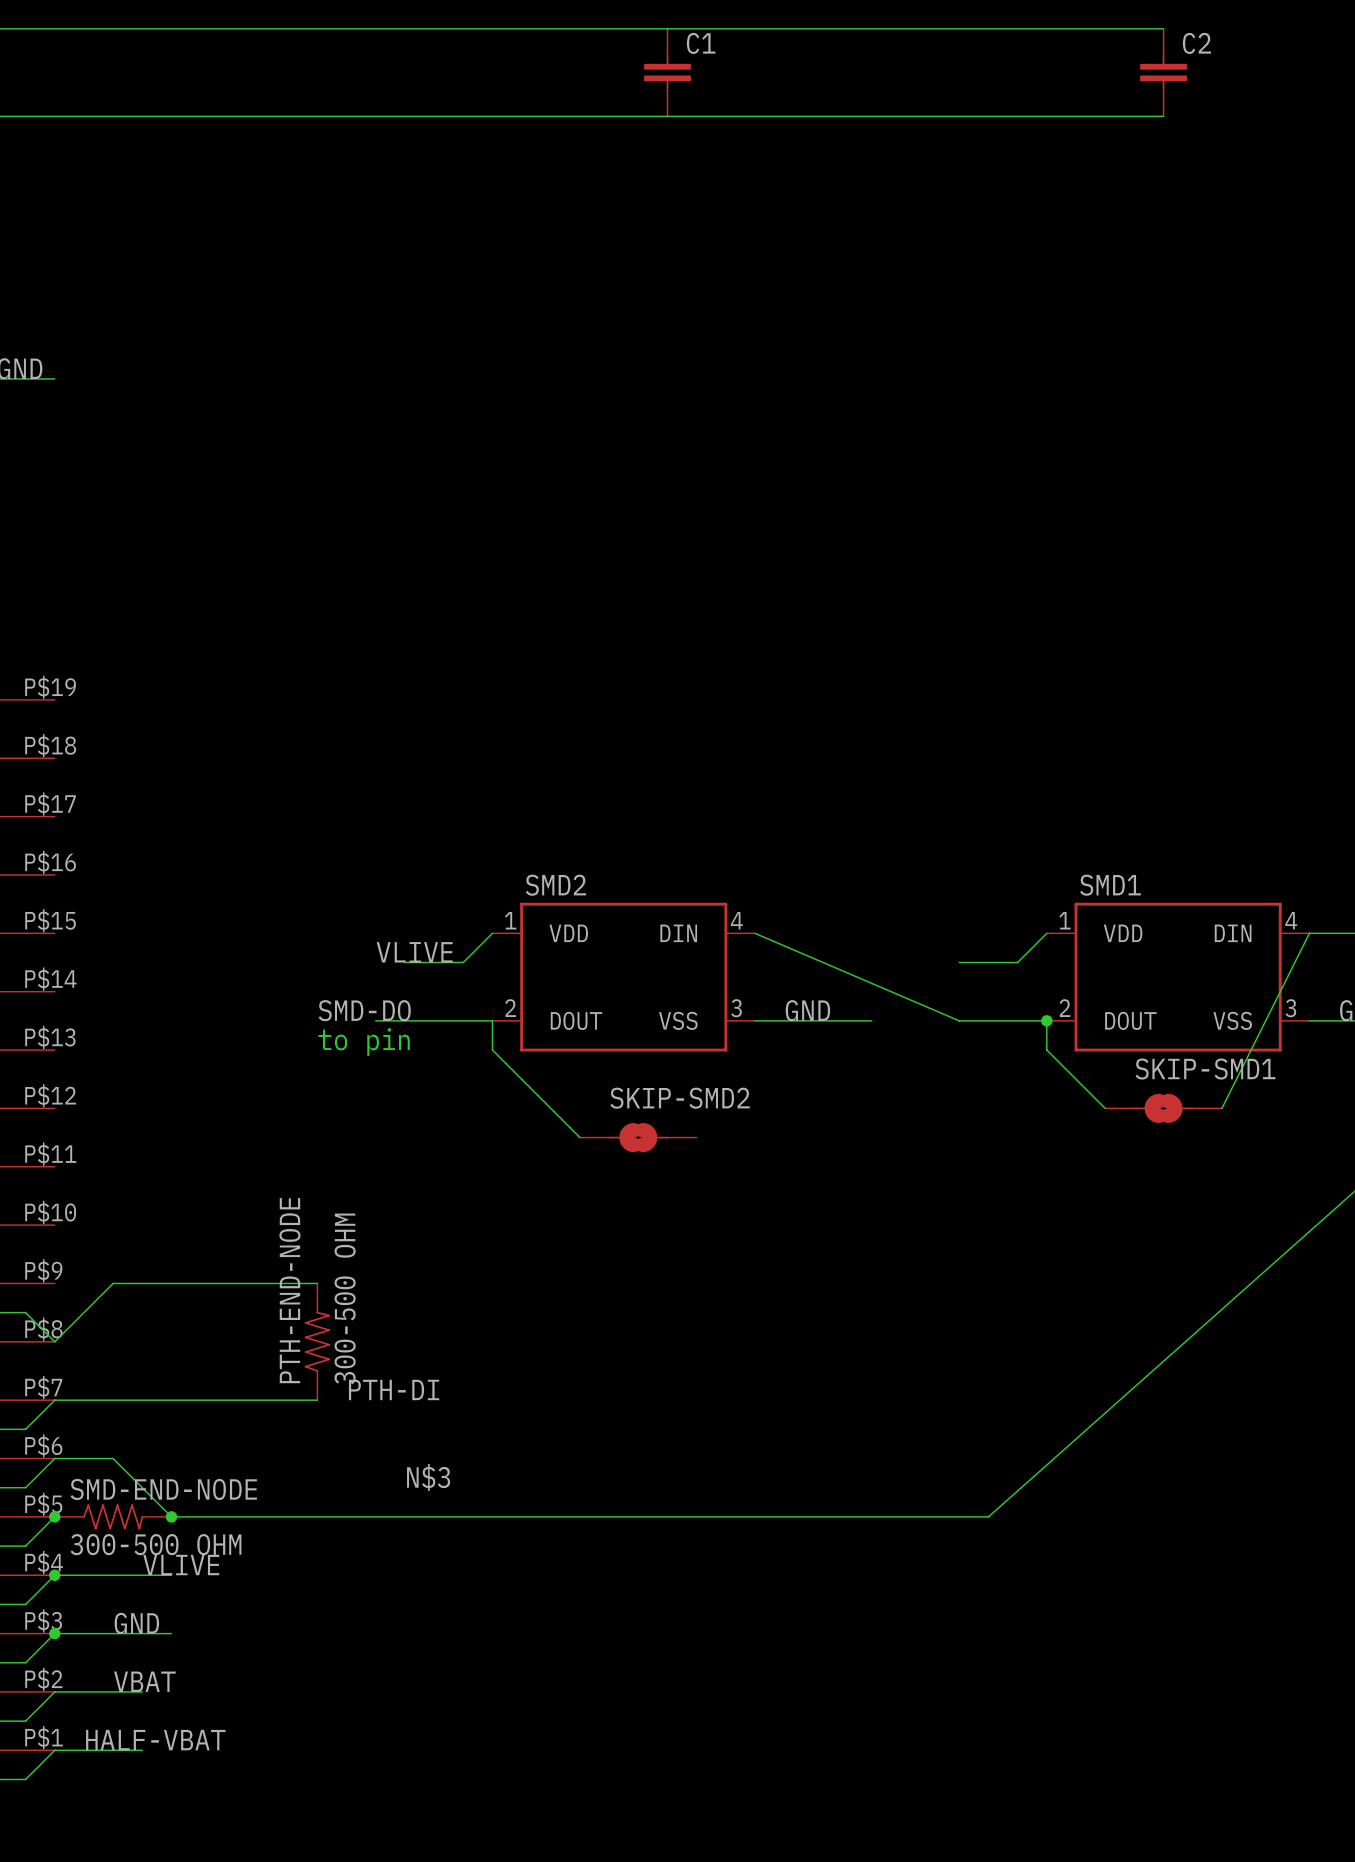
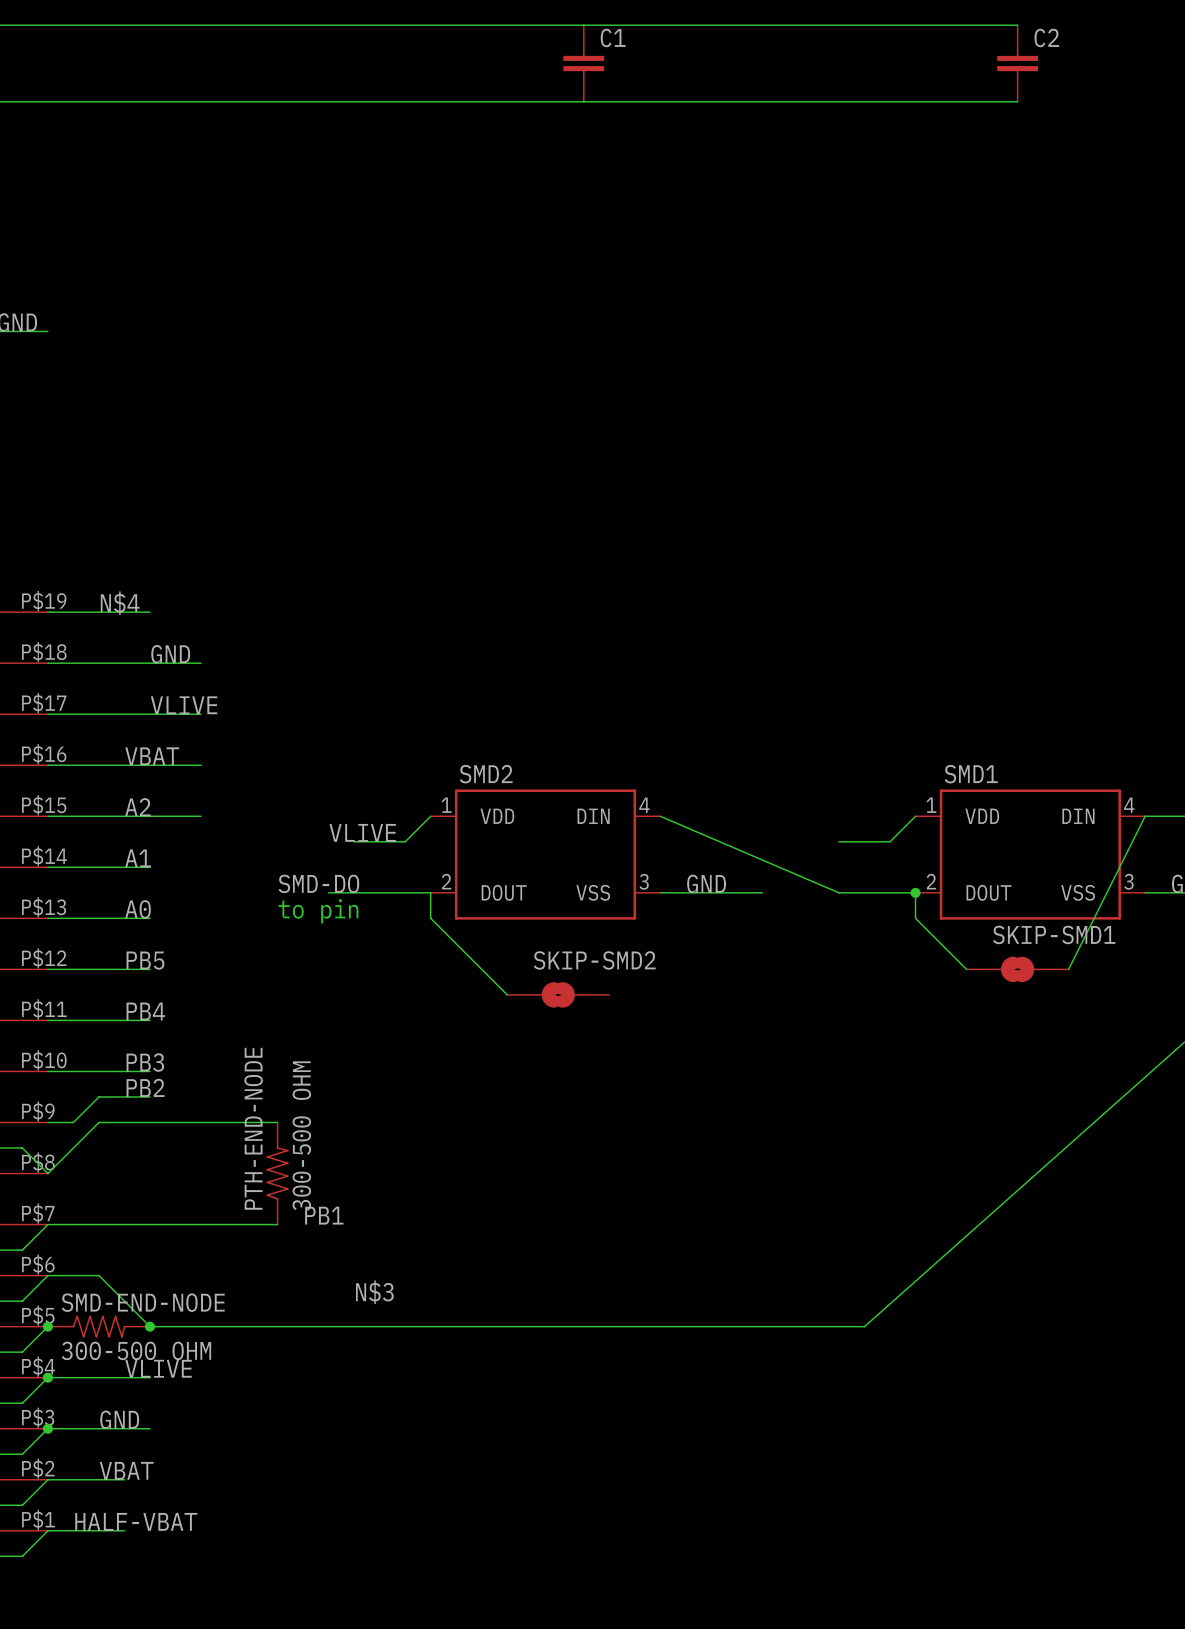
label: none -> N$4 (120, 603)
wire: none -> (47, 612) (149, 612)
label: none -> GND (170, 654)
wire: none -> (47, 663) (201, 663)
label: none -> VLIVE (184, 705)
wire: none -> (47, 714) (201, 714)
label: none -> VBAT (152, 756)
wire: none -> (47, 765) (201, 765)
label: none -> A2 (137, 807)
wire: none -> (47, 816) (201, 816)
label: none -> A1 (138, 858)
wire: none -> (47, 867) (149, 867)
label: none -> A0 (138, 909)
wire: none -> (47, 918) (149, 918)
label: none -> PB5 (145, 960)
wire: none -> (47, 969) (149, 969)
label: none -> PB4 (145, 1011)
wire: none -> (47, 1020) (149, 1020)
label: none -> PB3 (145, 1062)
wire: none -> (47, 1071) (149, 1071)
label: none -> PB2 (145, 1087)
wire: none -> (149, 1096) (98, 1096) (73, 1122) (47, 1122)
label: PTH-DI (394, 1389) -> PB1 (324, 1215)

